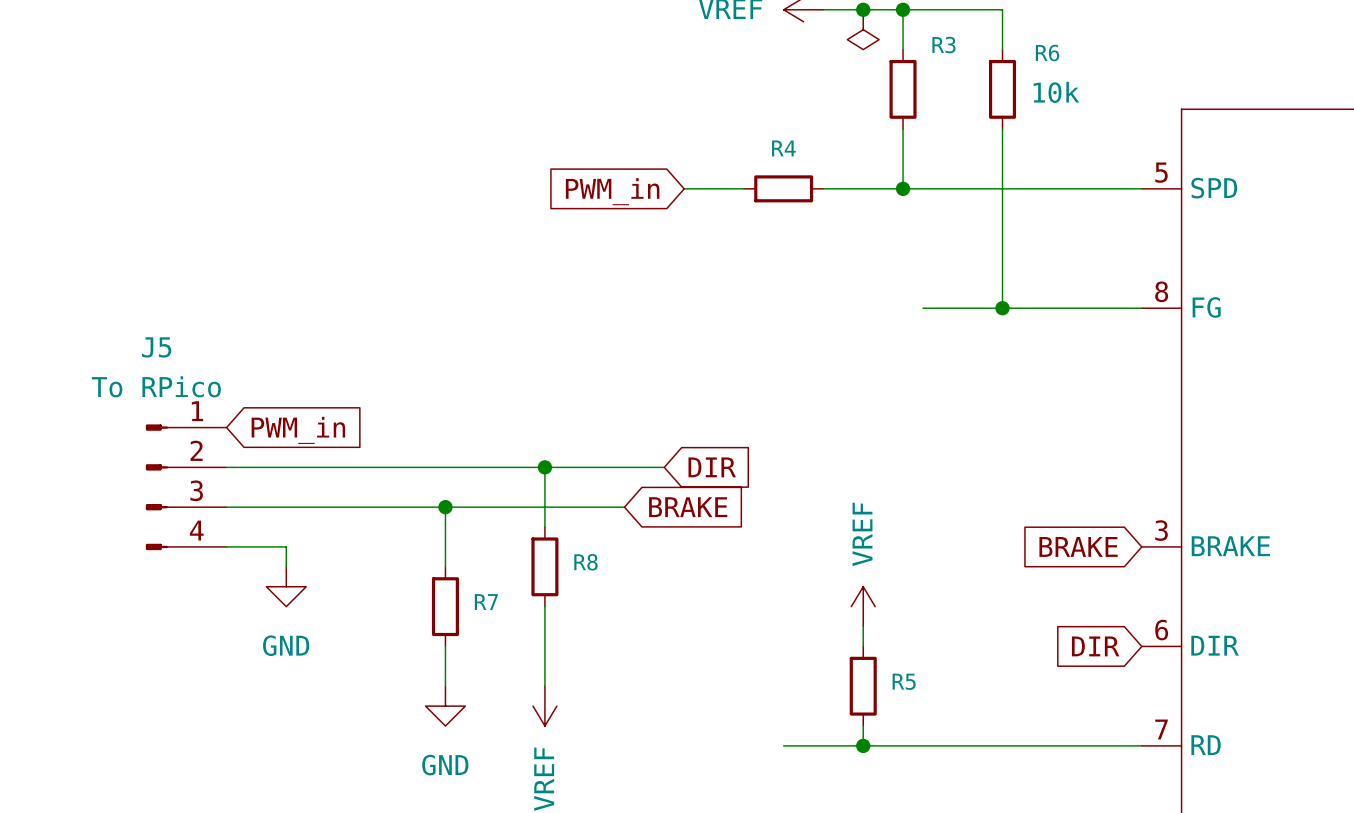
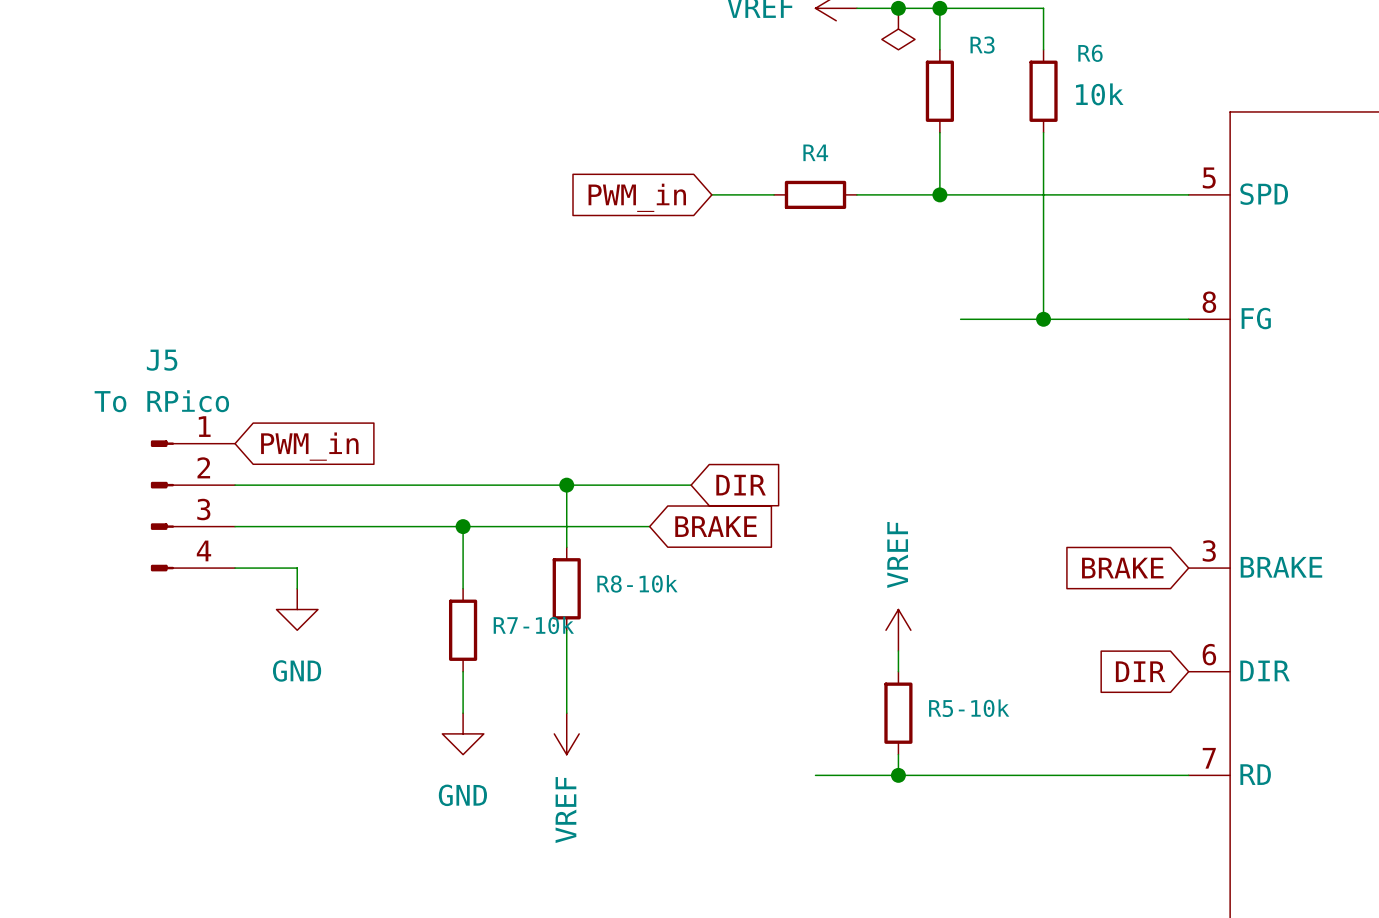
R8 name: R8 (585, 562) -> R8-10k (637, 583)
R7 name: R7 (486, 602) -> R7-10k (533, 625)
R5 name: R5 (904, 681) -> R5-10k (969, 708)

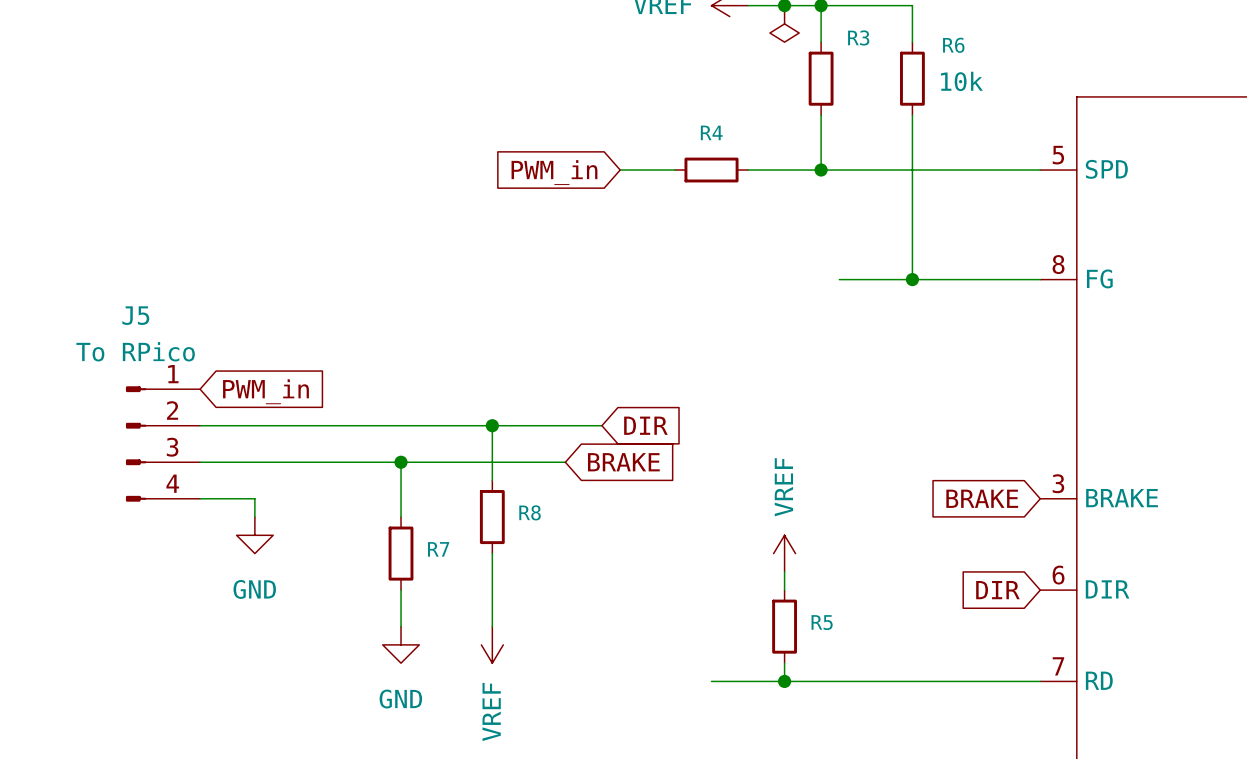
R8-10k name: R8-10k (637, 583) -> R8 (530, 512)
R7-10k name: R7-10k (533, 625) -> R7 (438, 549)
R5-10k name: R5-10k (969, 708) -> R5 (822, 622)

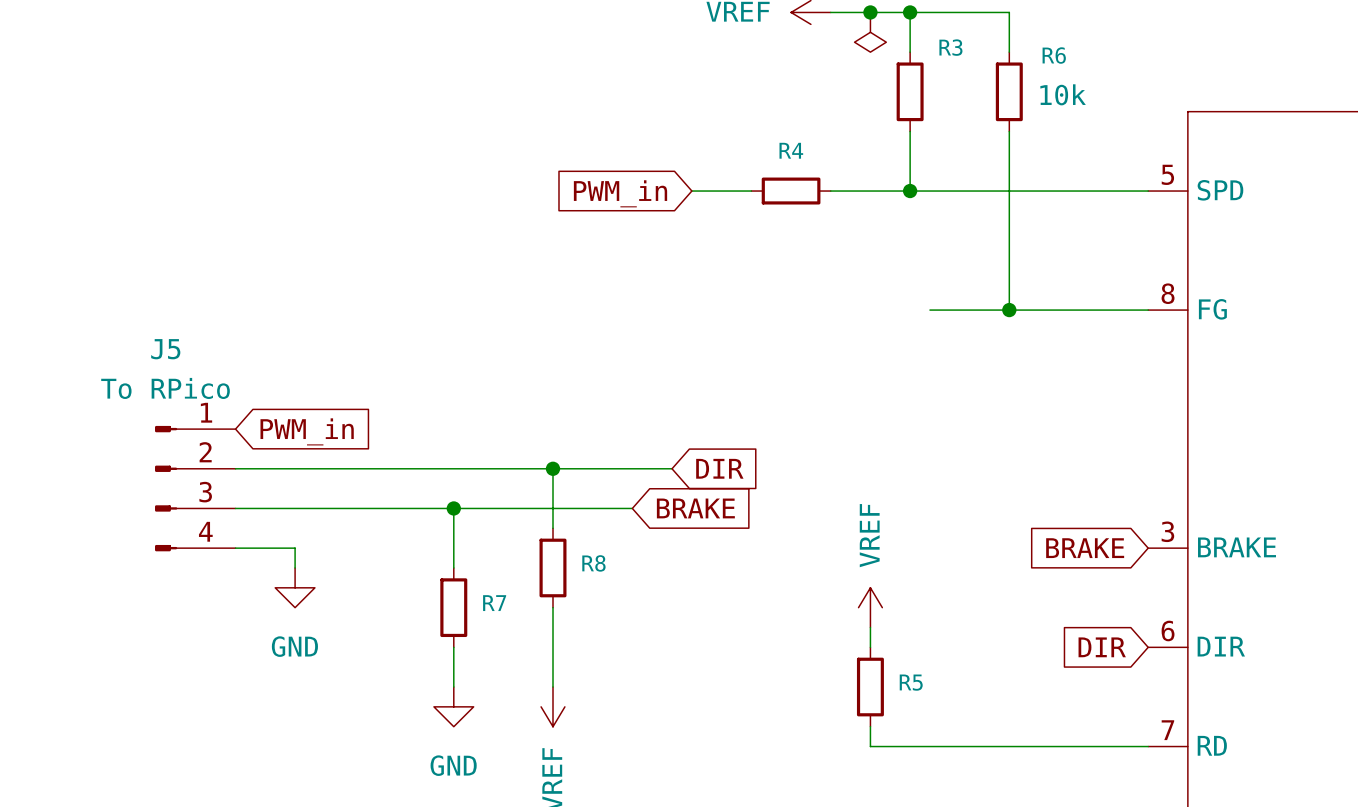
wire: (711, 681) (784, 681) -> none
junction: (784, 681) -> none

